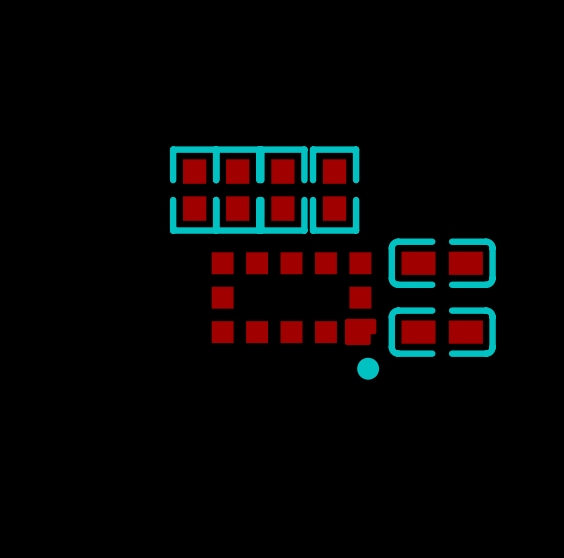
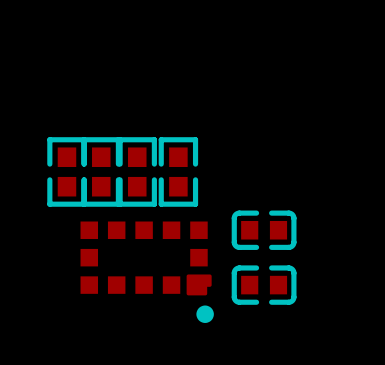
part footprint: [388, 238, 496, 289] -> [231, 210, 297, 250]
part footprint: [388, 307, 496, 357] -> [231, 265, 297, 305]

